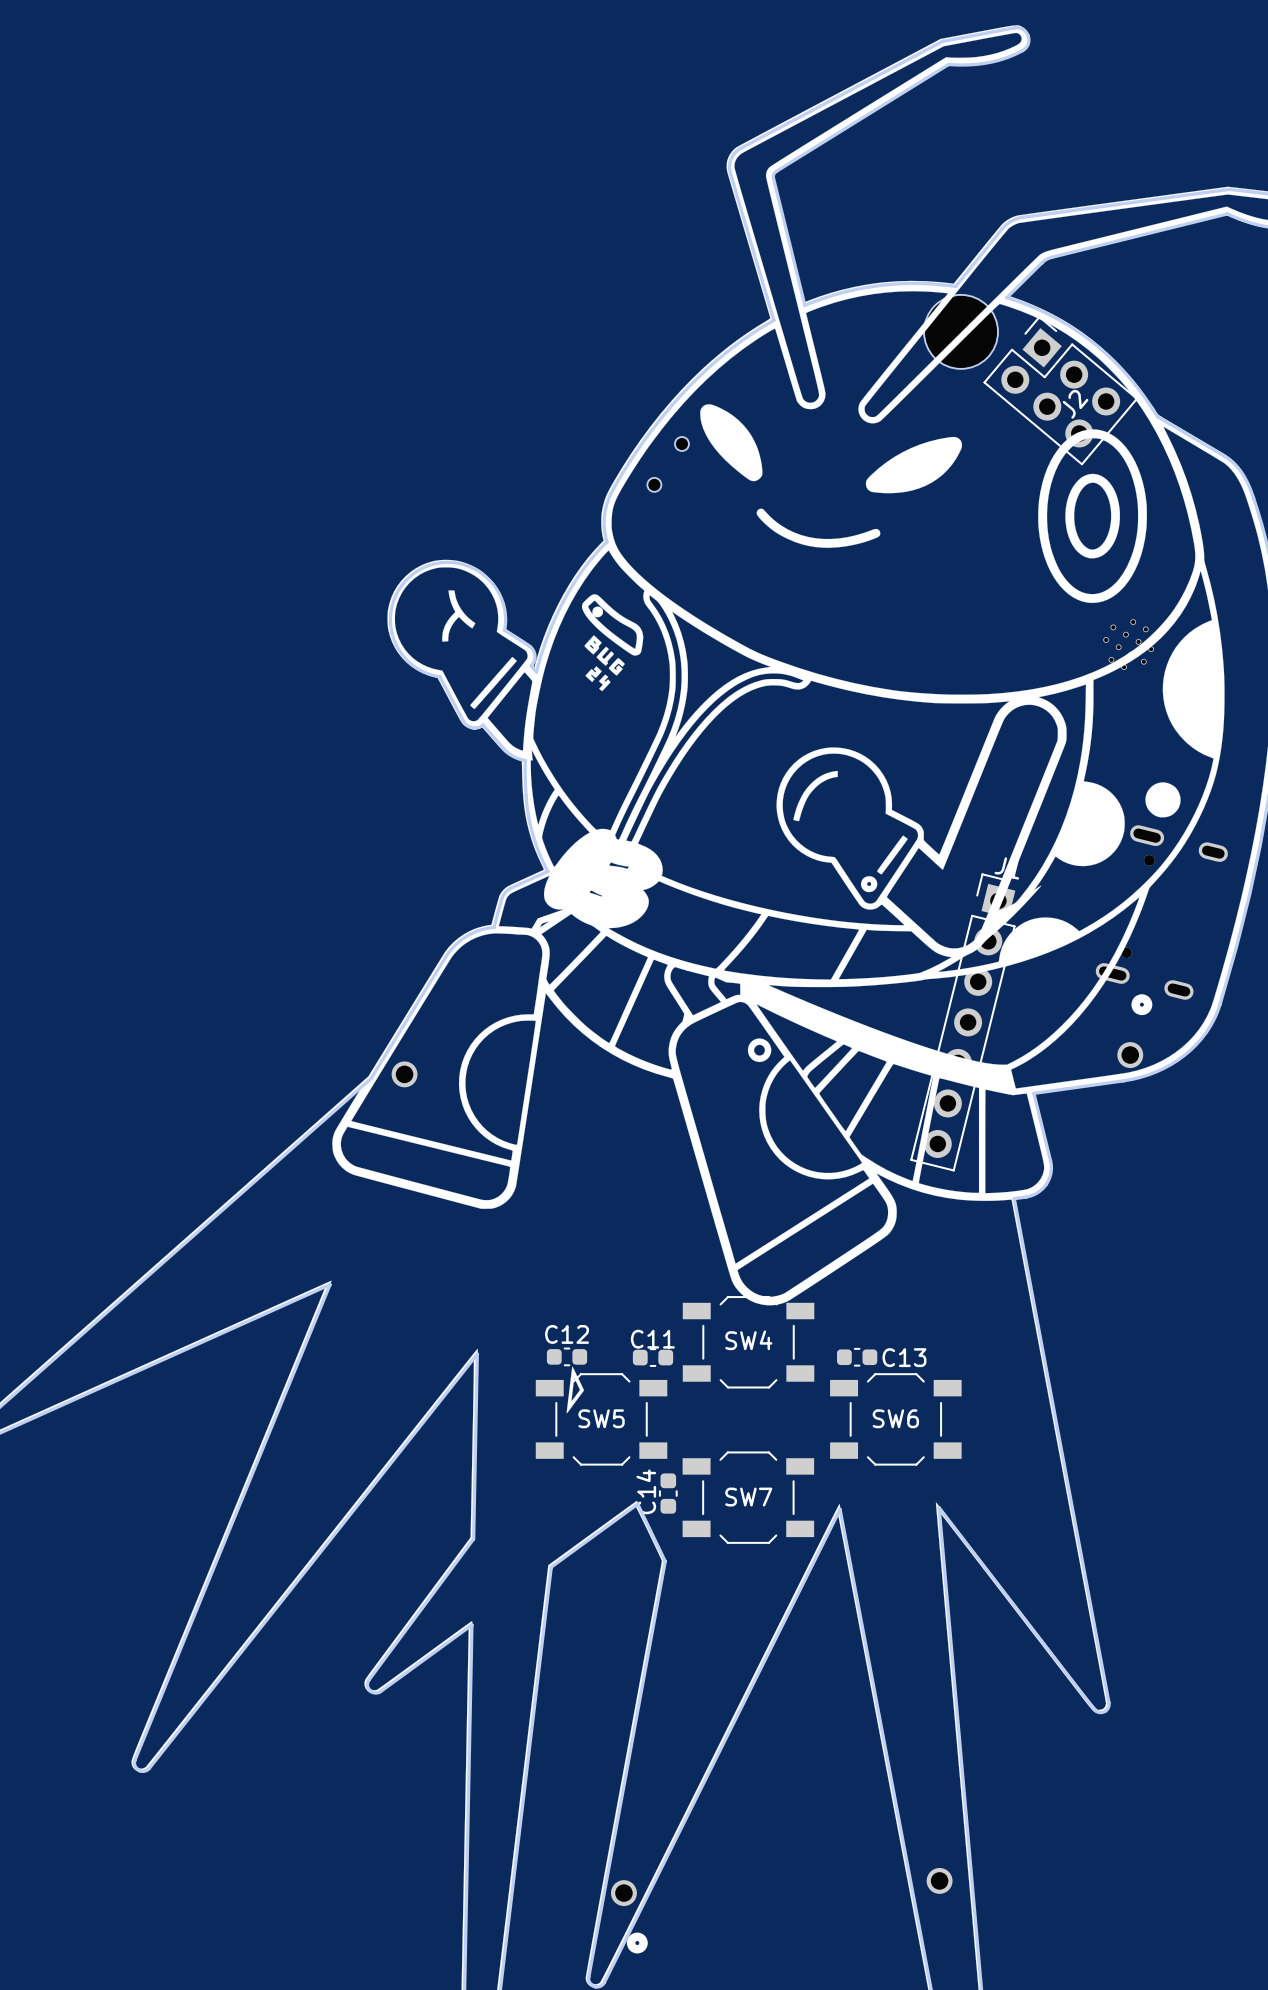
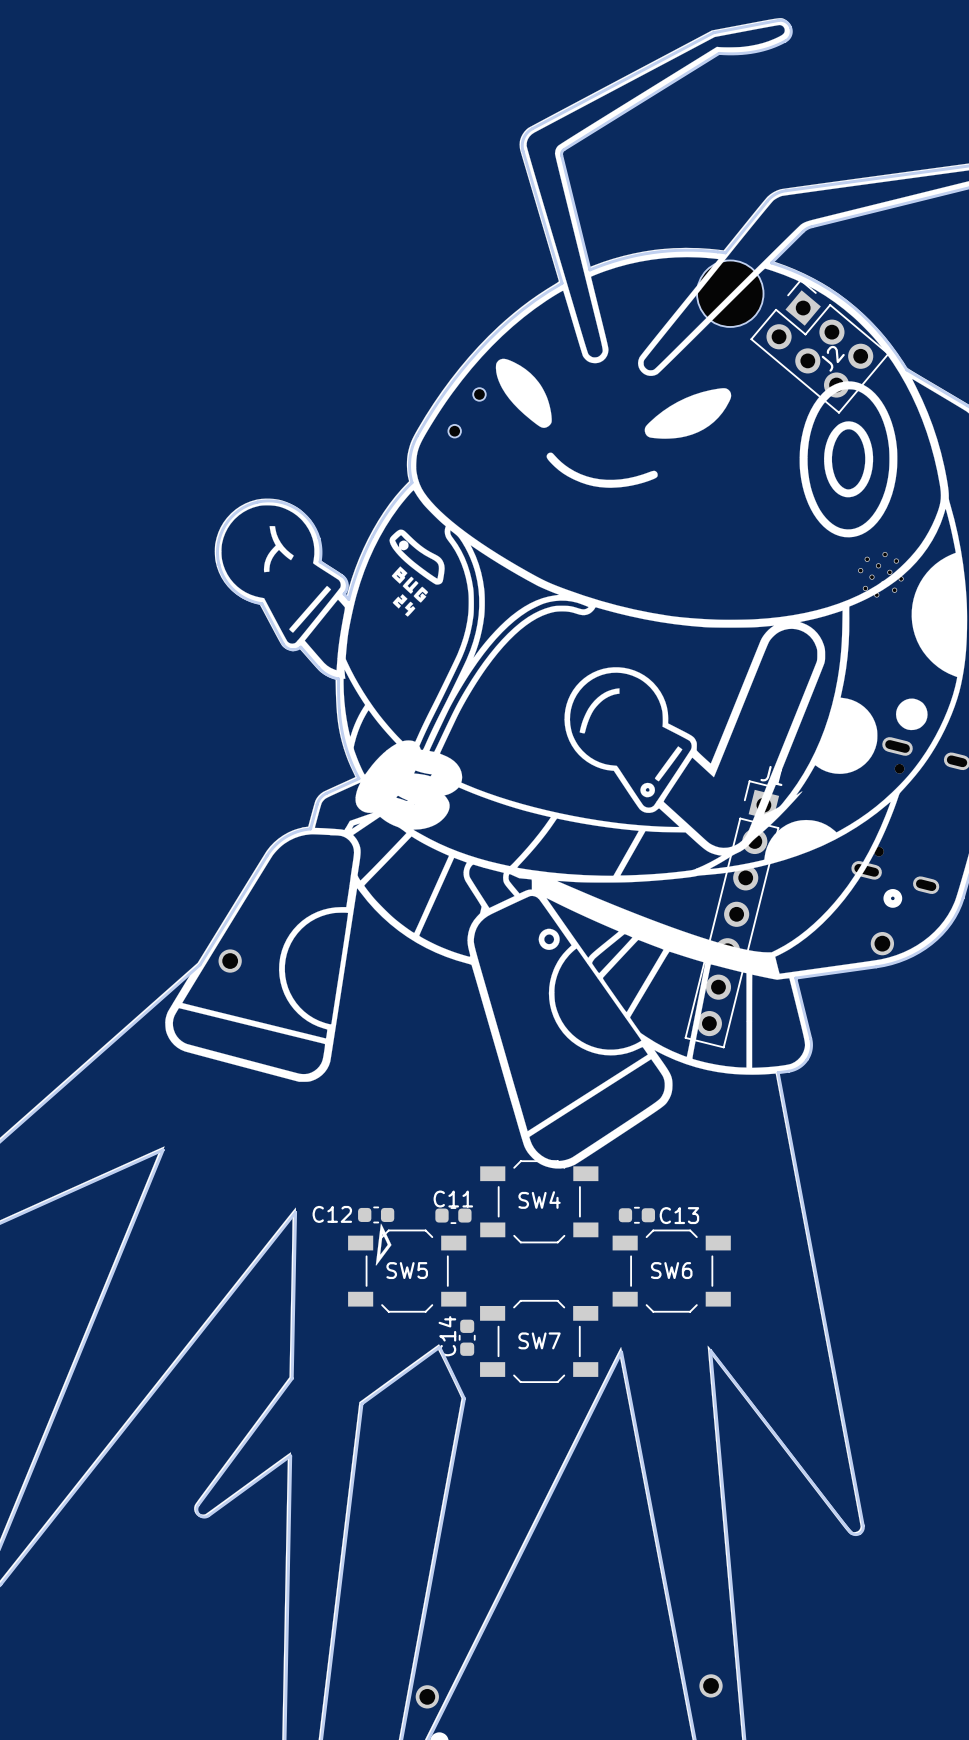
C12 name position: C12 (567, 1334) -> C12 (332, 1214)

